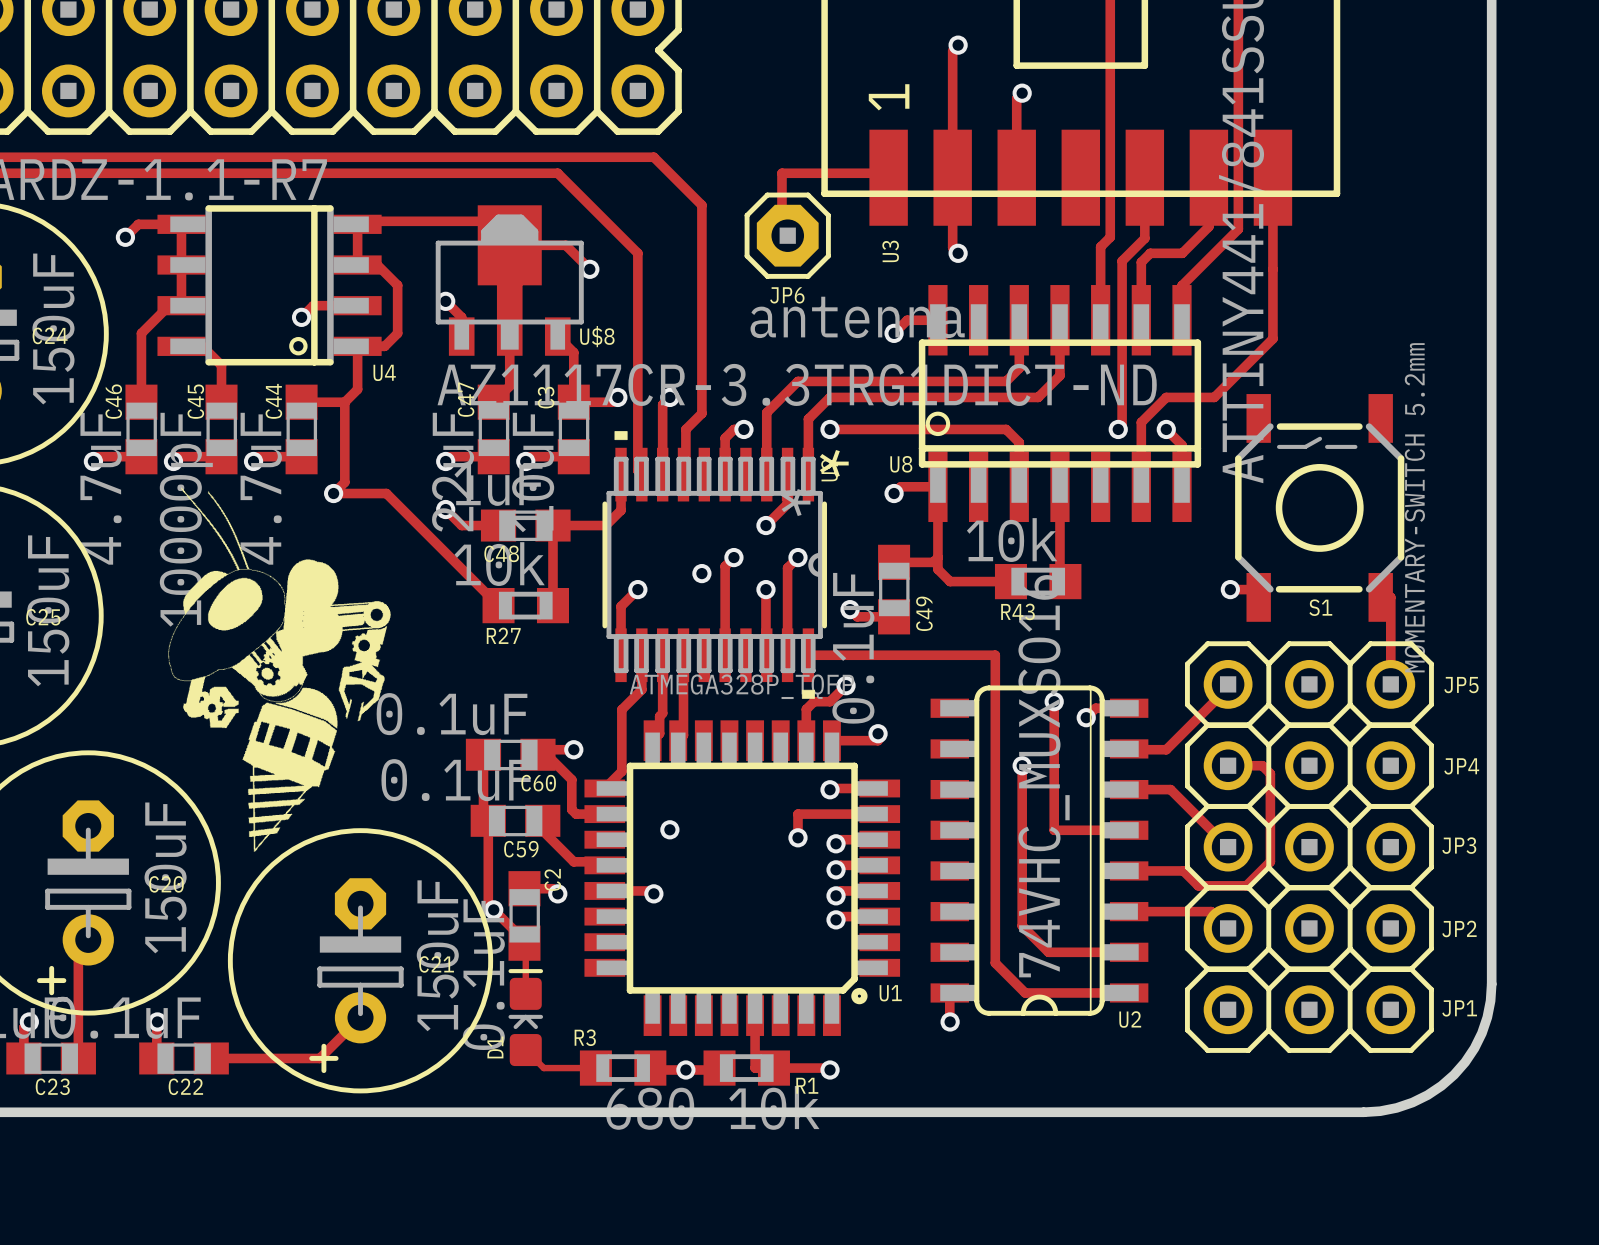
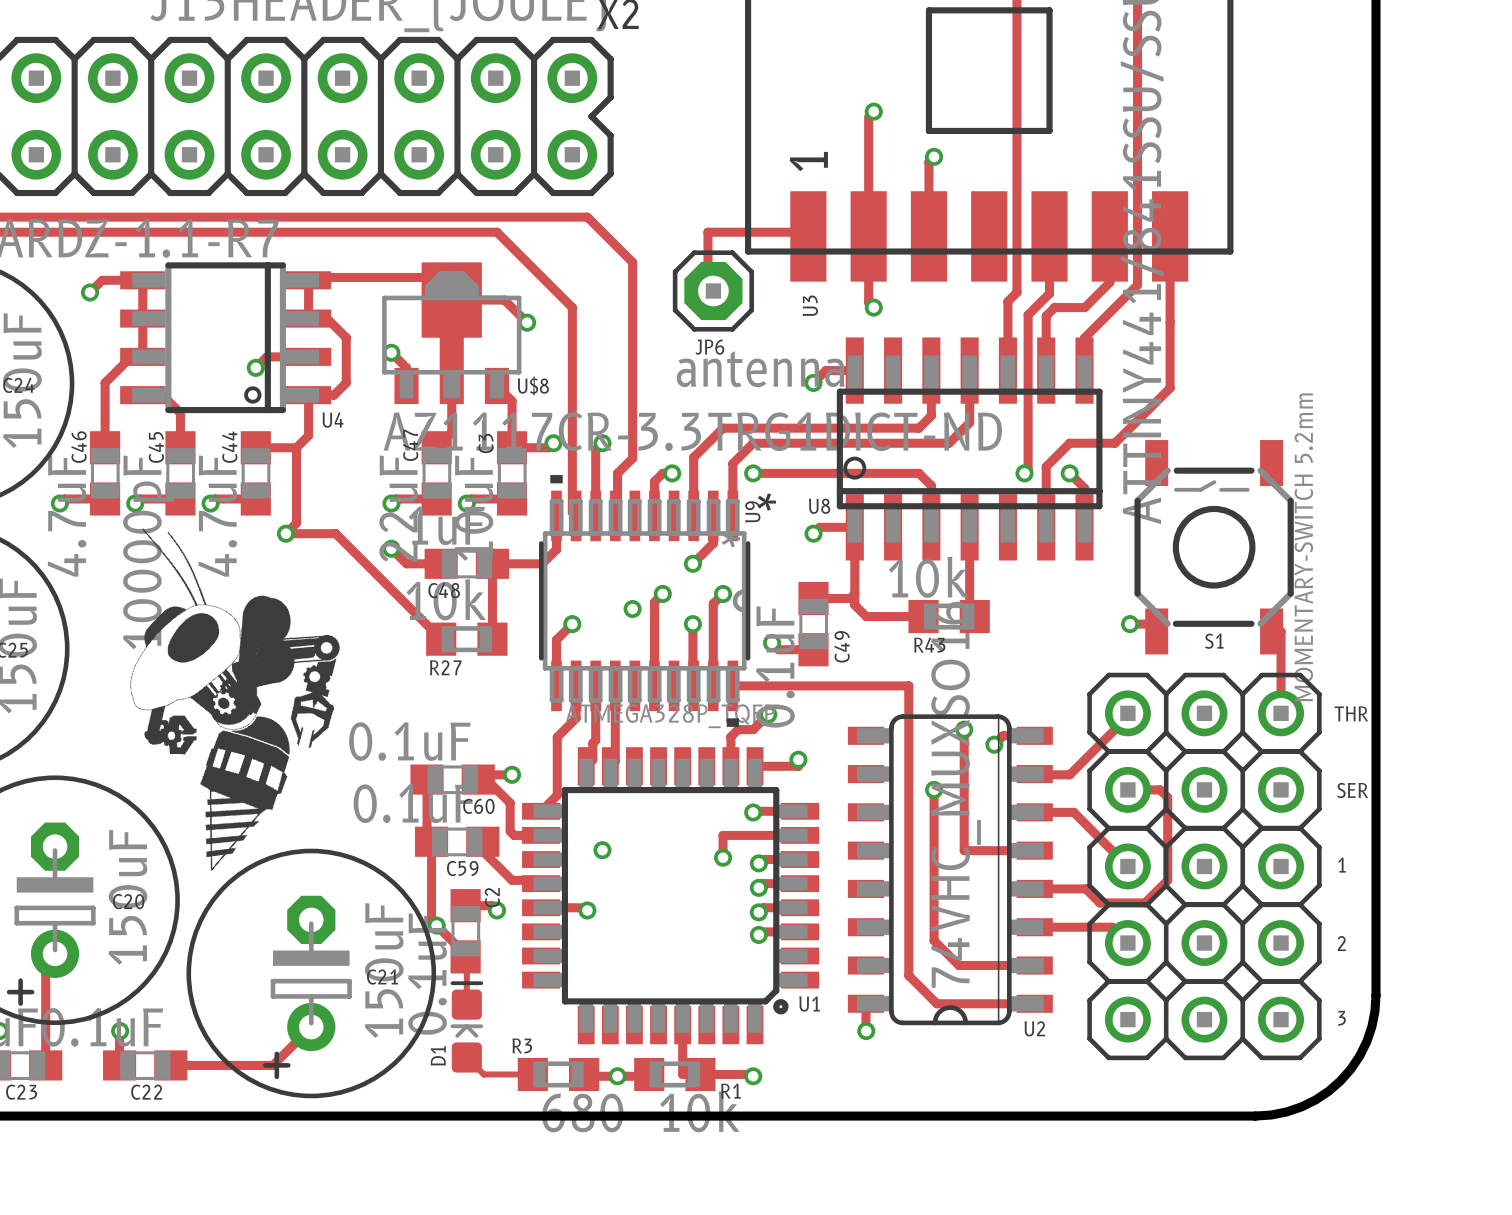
JP5 name: JP5 (1461, 685) -> THR (1351, 713)
JP4 name: JP4 (1461, 766) -> SER (1352, 790)
JP3 name: JP3 (1459, 845) -> 1 (1341, 865)
JP2 name: JP2 (1459, 928) -> 2 (1341, 943)
JP1 name: JP1 (1459, 1008) -> 3 (1342, 1018)

